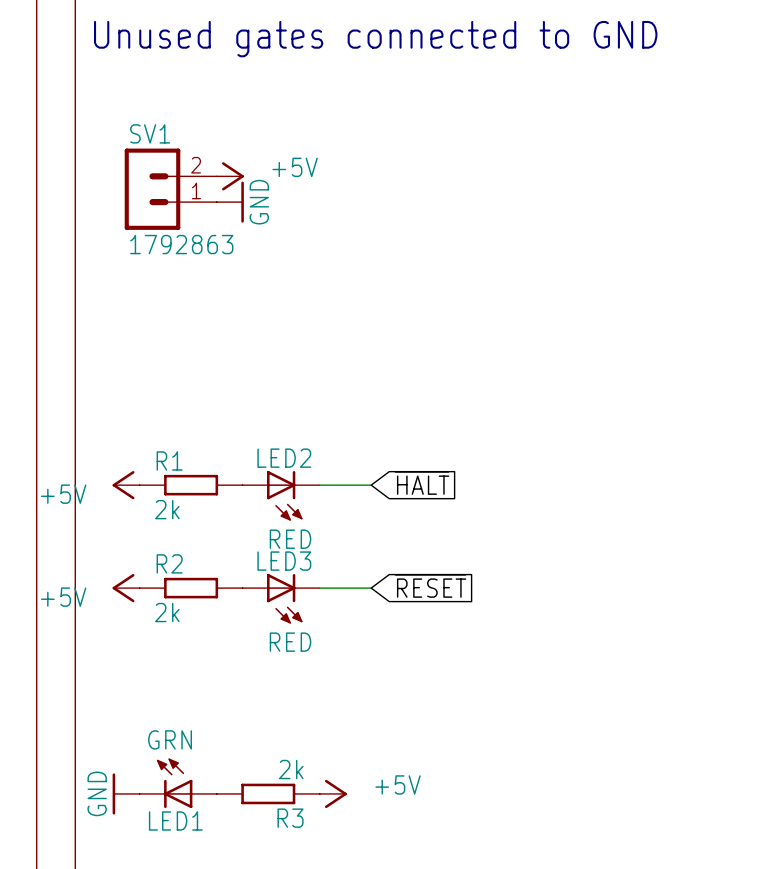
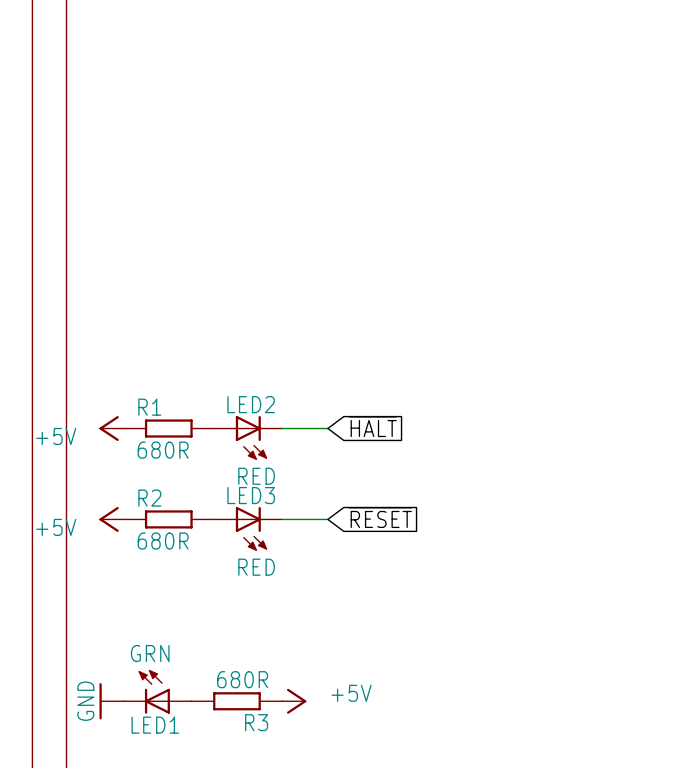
text: Unused gates connected to GND (375, 39) -> none
power symbol: +5V (230, 176) -> none
SV1: 1792863 (170, 189) -> none
power symbol: GND (230, 202) -> none
R1 value: 2k (167, 509) -> 680R (163, 450)
R2 value: 2k (167, 612) -> 680R (163, 541)
R3 value: 2k (291, 769) -> 680R (242, 679)

